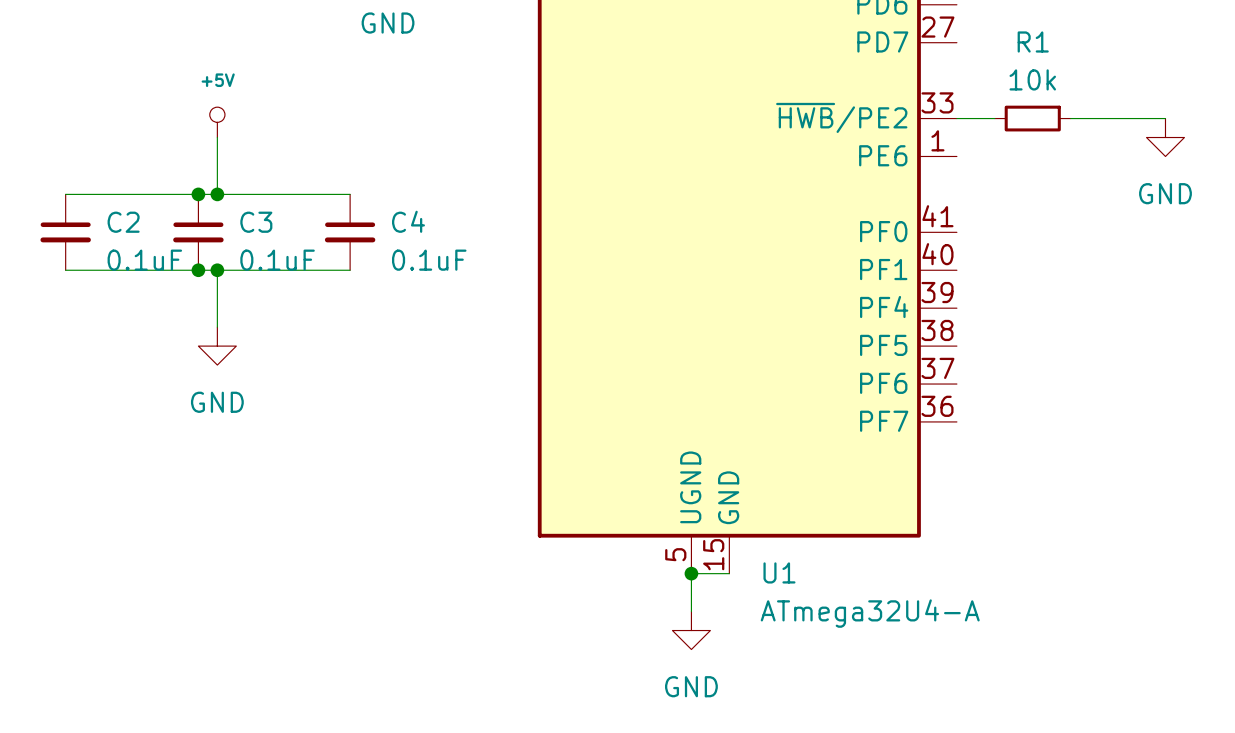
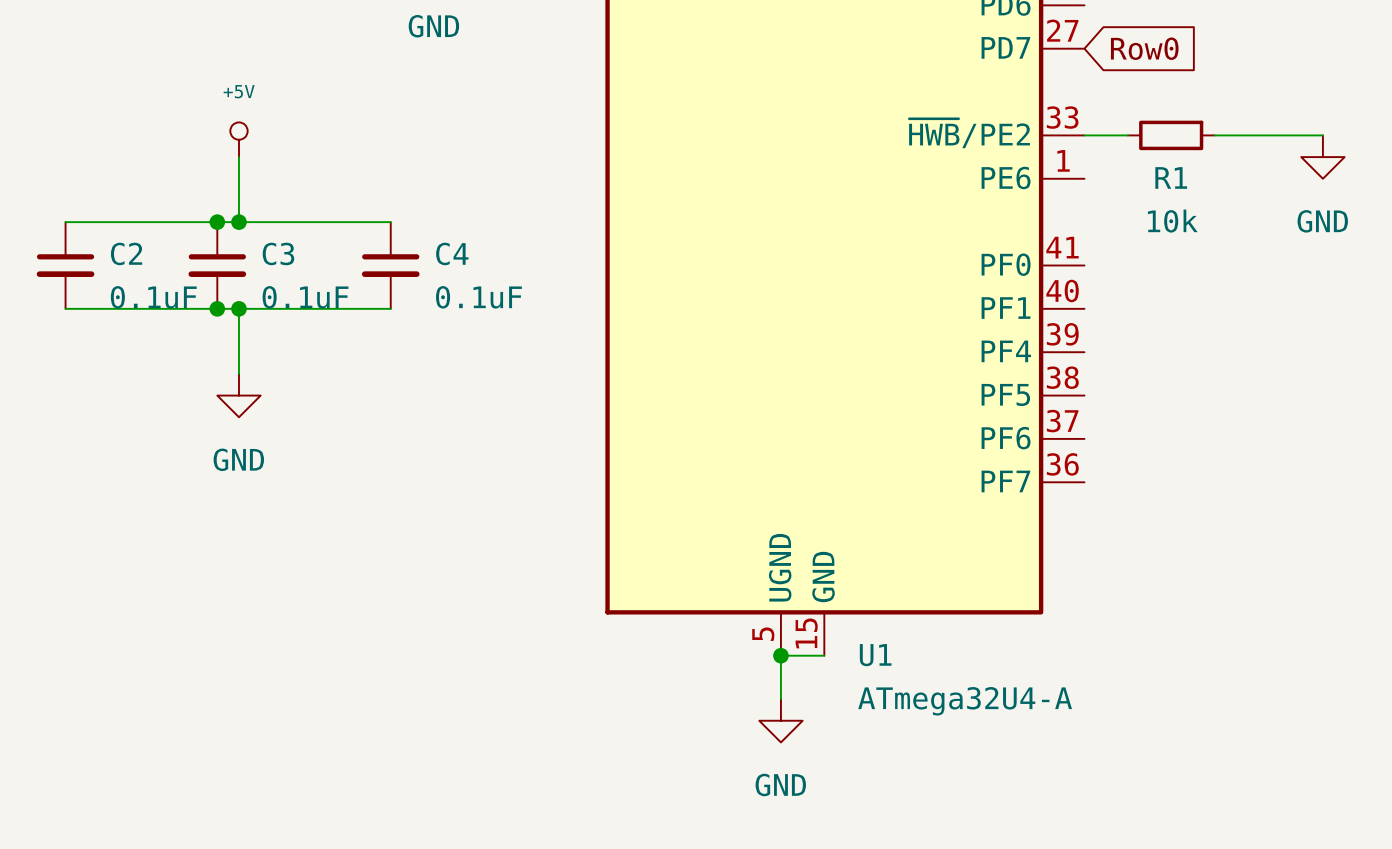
R1 name position: R1 (1033, 41) -> R1 (1171, 177)
global label: none -> Row0 (1144, 48)
R1 value position: 10k (1032, 79) -> 10k (1172, 221)

